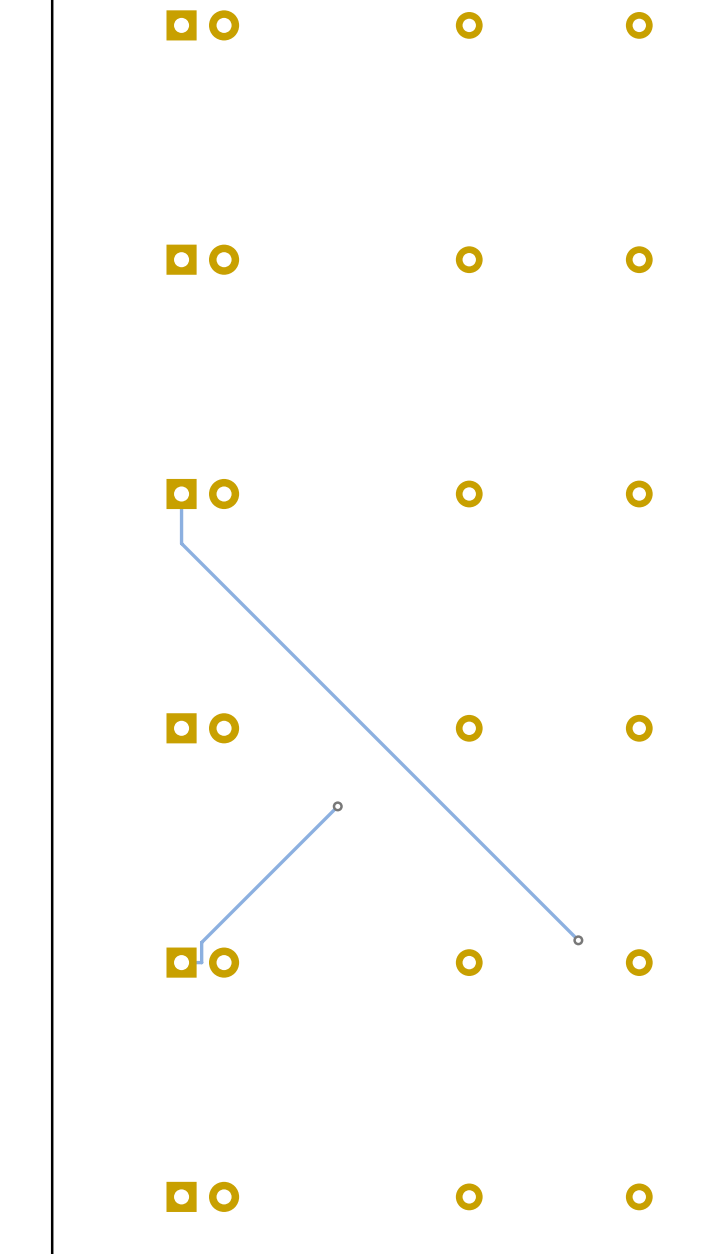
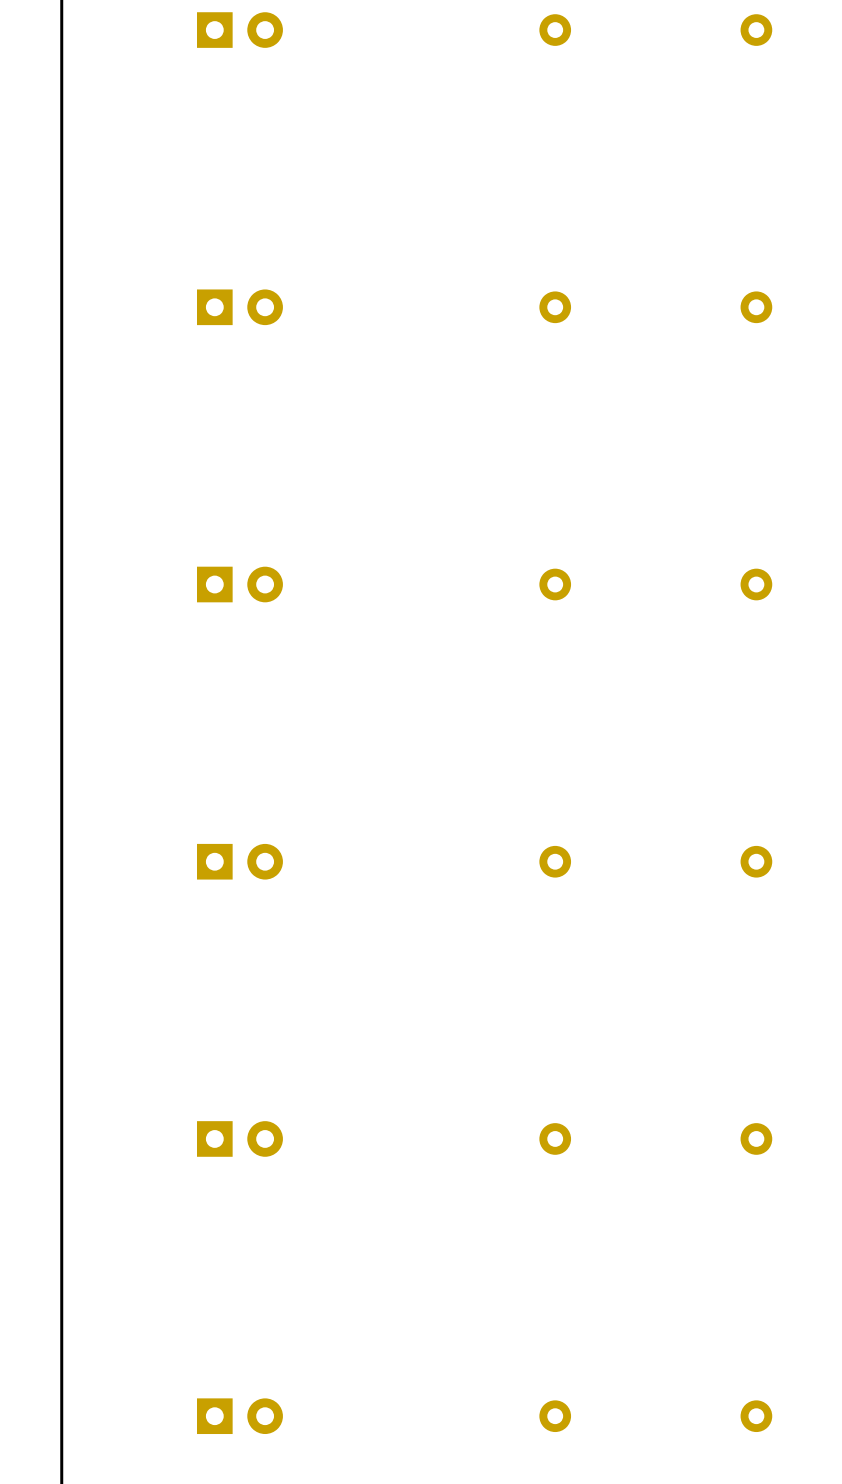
track: (181, 494) (181, 543) (578, 940) -> none
track: (337, 806) (201, 942) (201, 962) (181, 962) -> none
via: (337, 806) -> none
via: (578, 940) -> none

